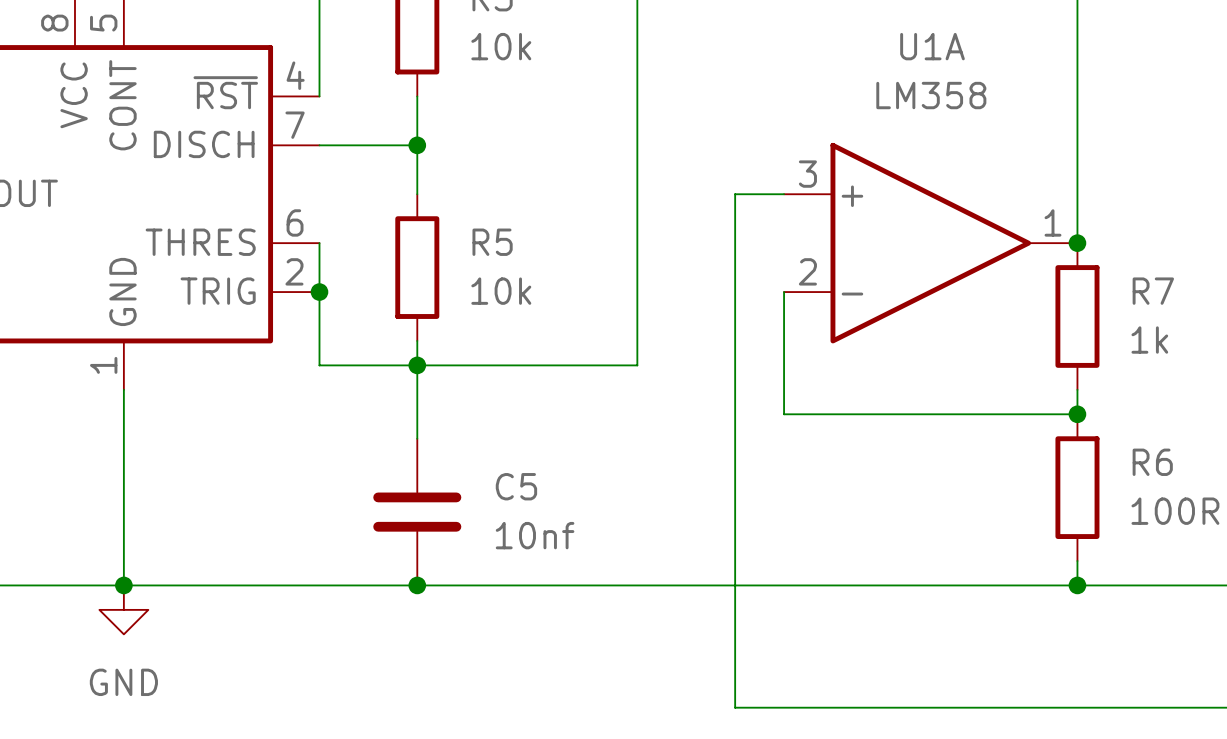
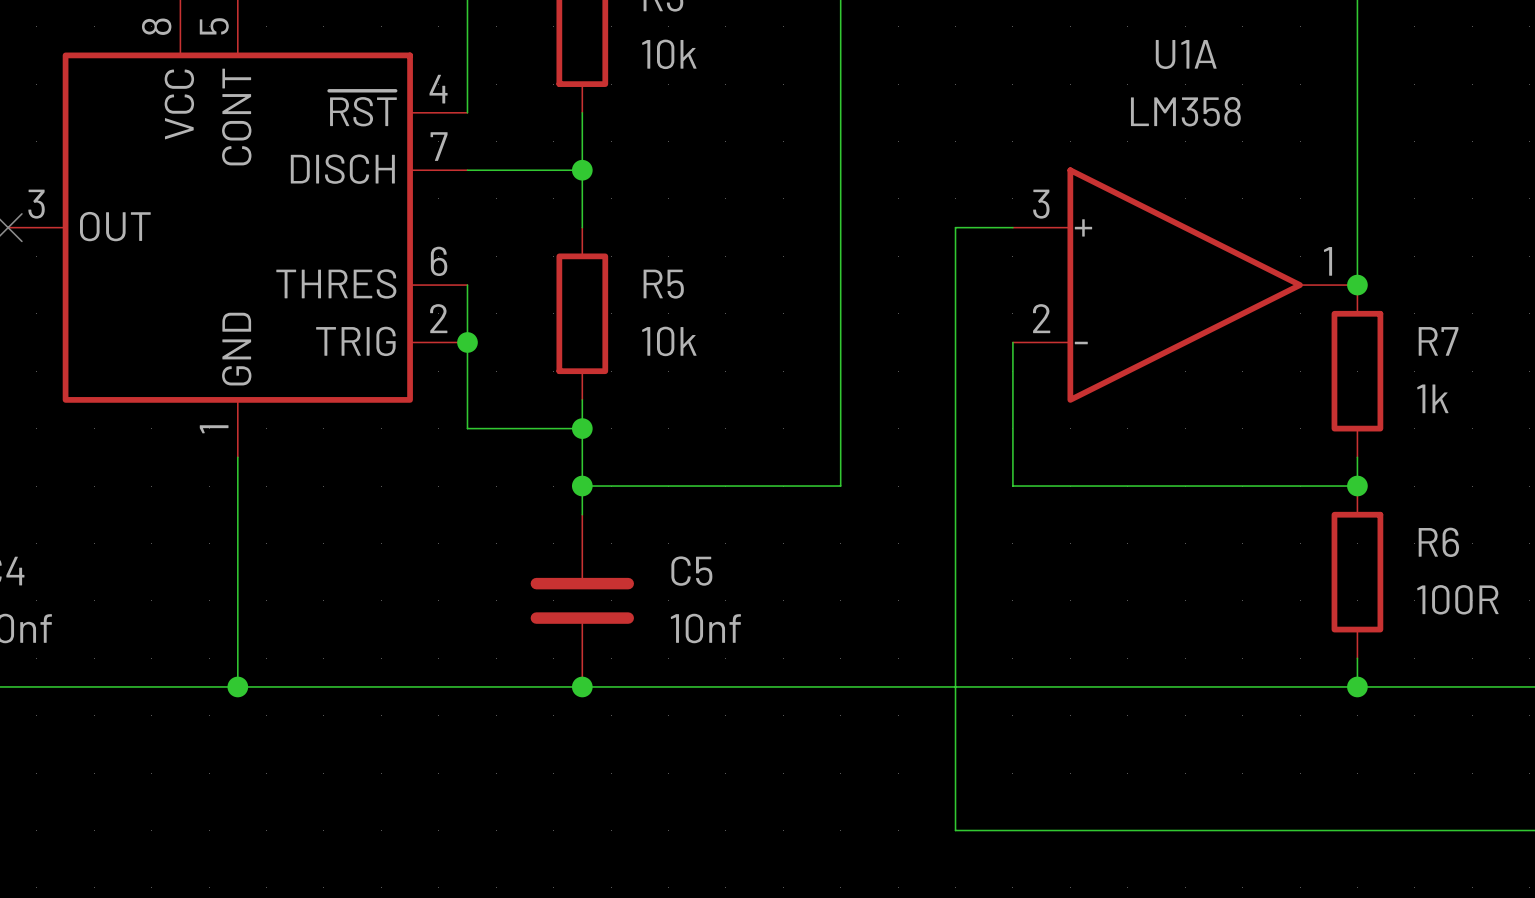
wire: (417, 365) (637, 365) -> (582, 486) (840, 486) (840, 428)
junction: none -> (582, 486)
power symbol: GND (123, 609) -> none

